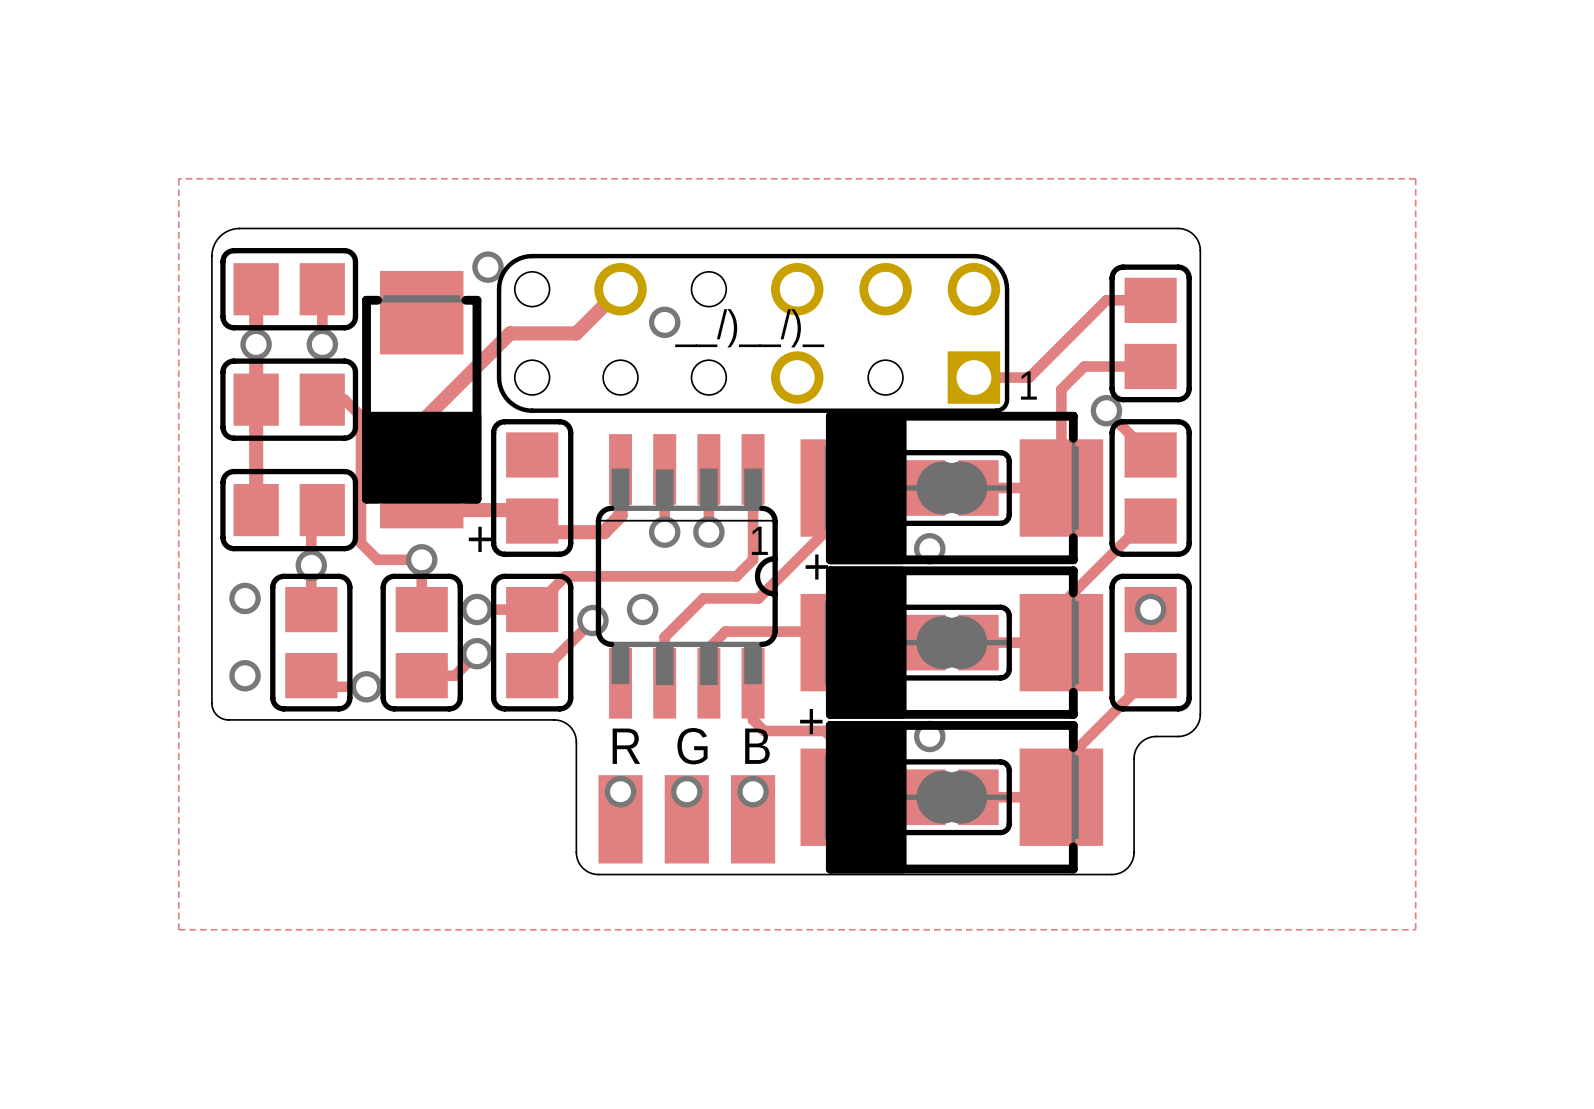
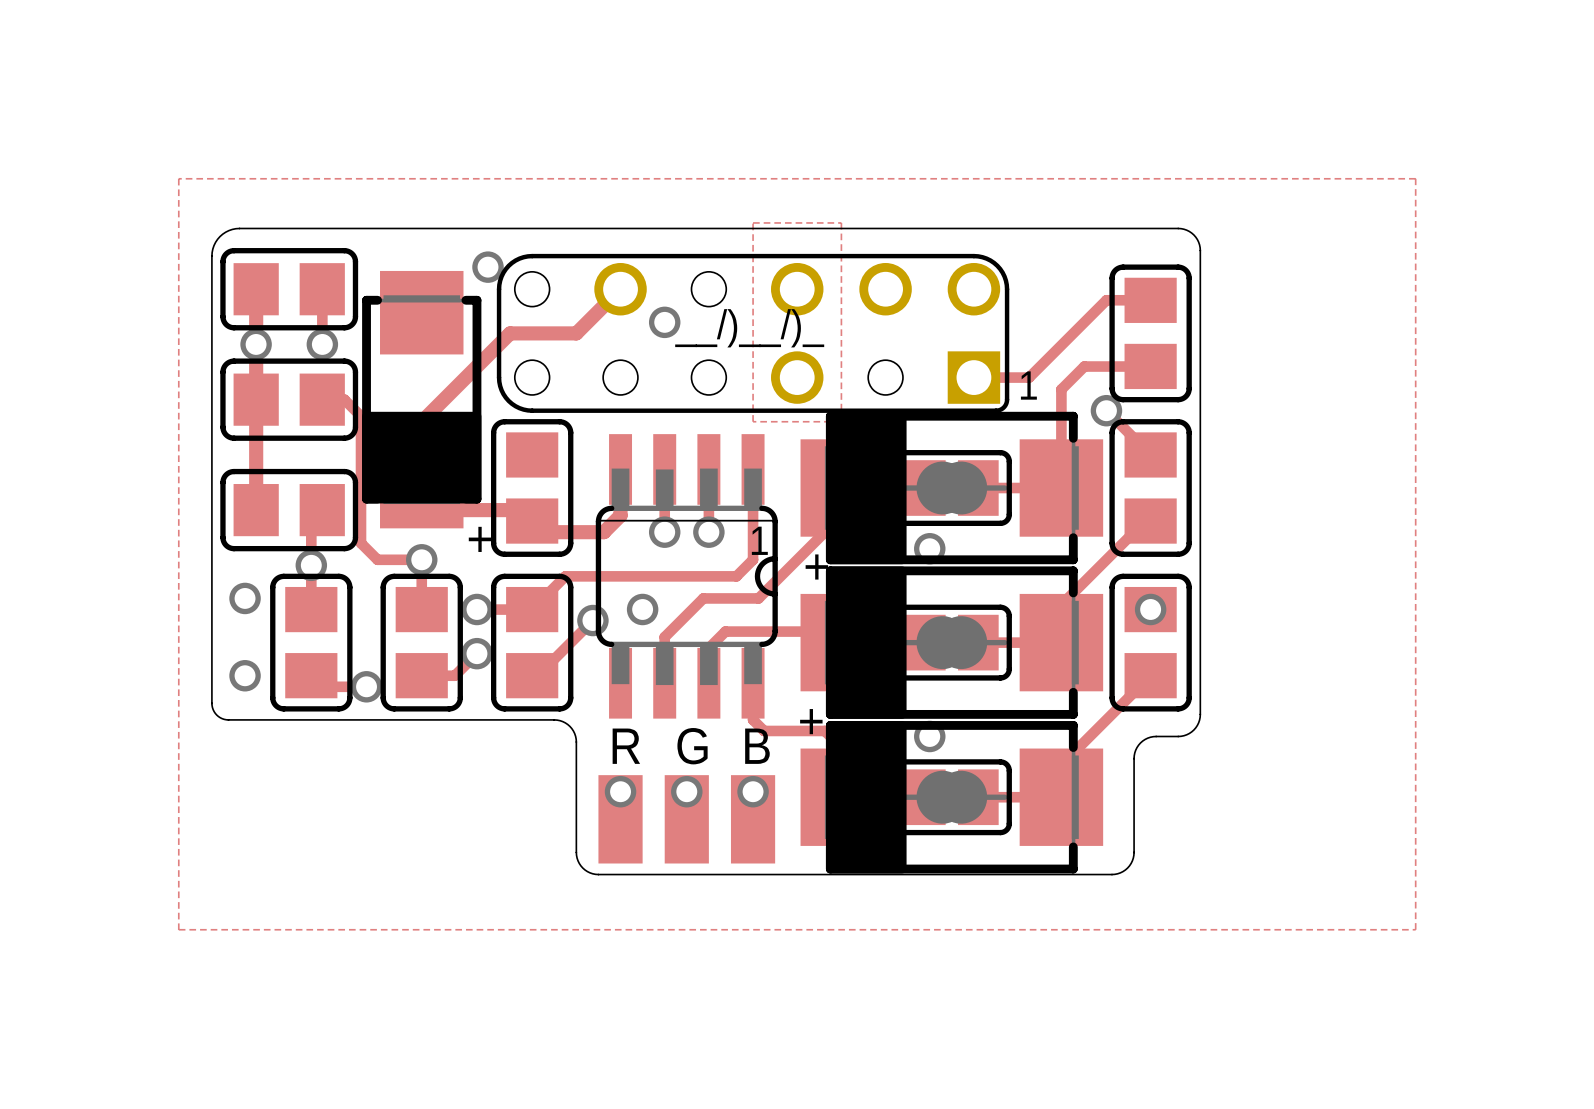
zone outline: none -> (753, 222) (841, 222) (841, 421) (753, 421) (753, 222)

